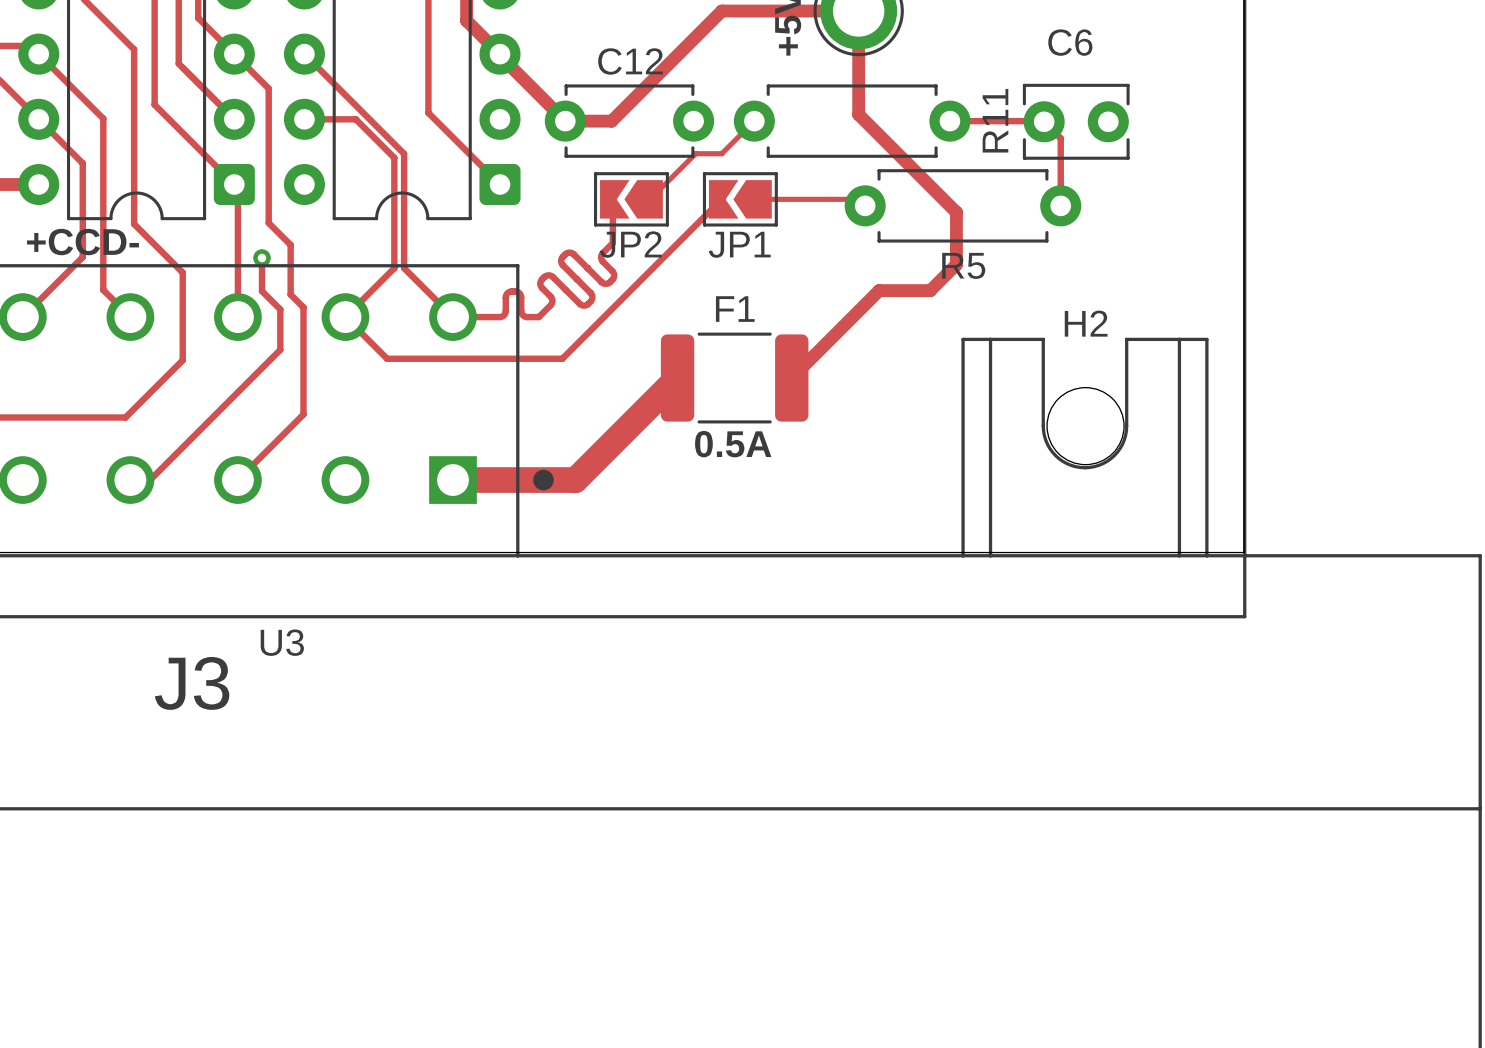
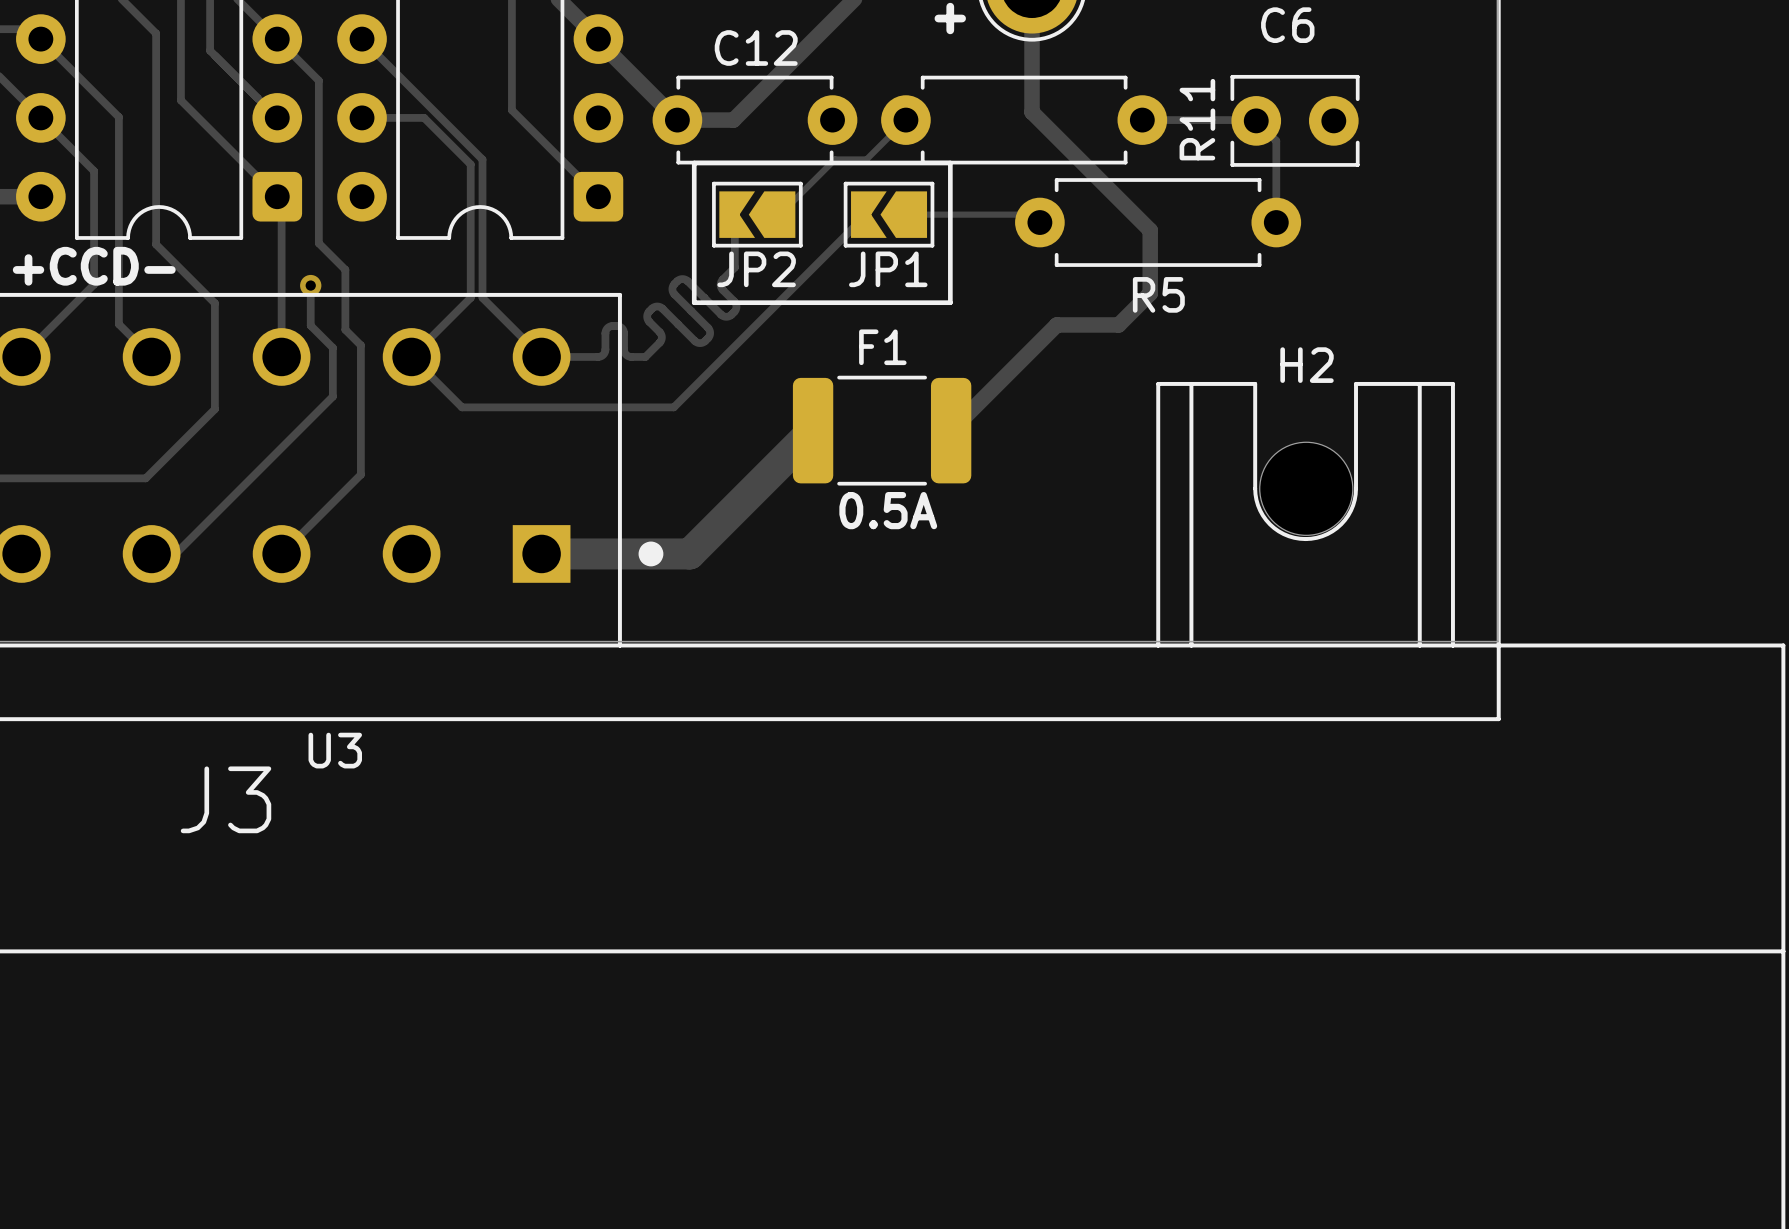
line: none -> (694, 163) (950, 163) (950, 302) (694, 302) (694, 163)

